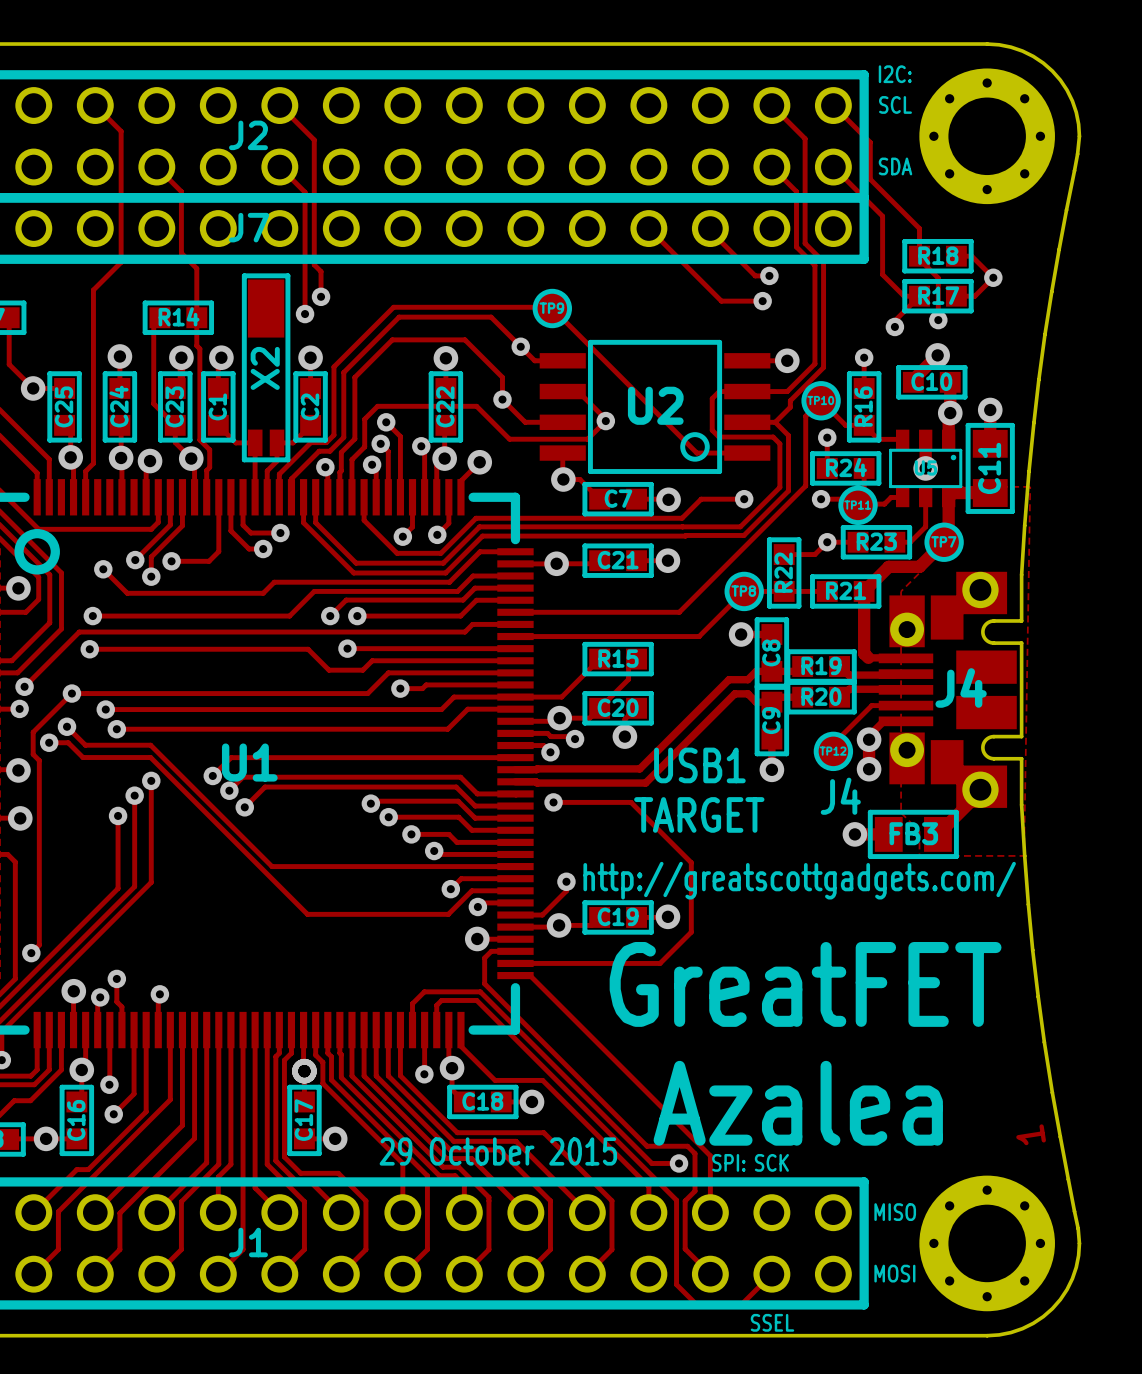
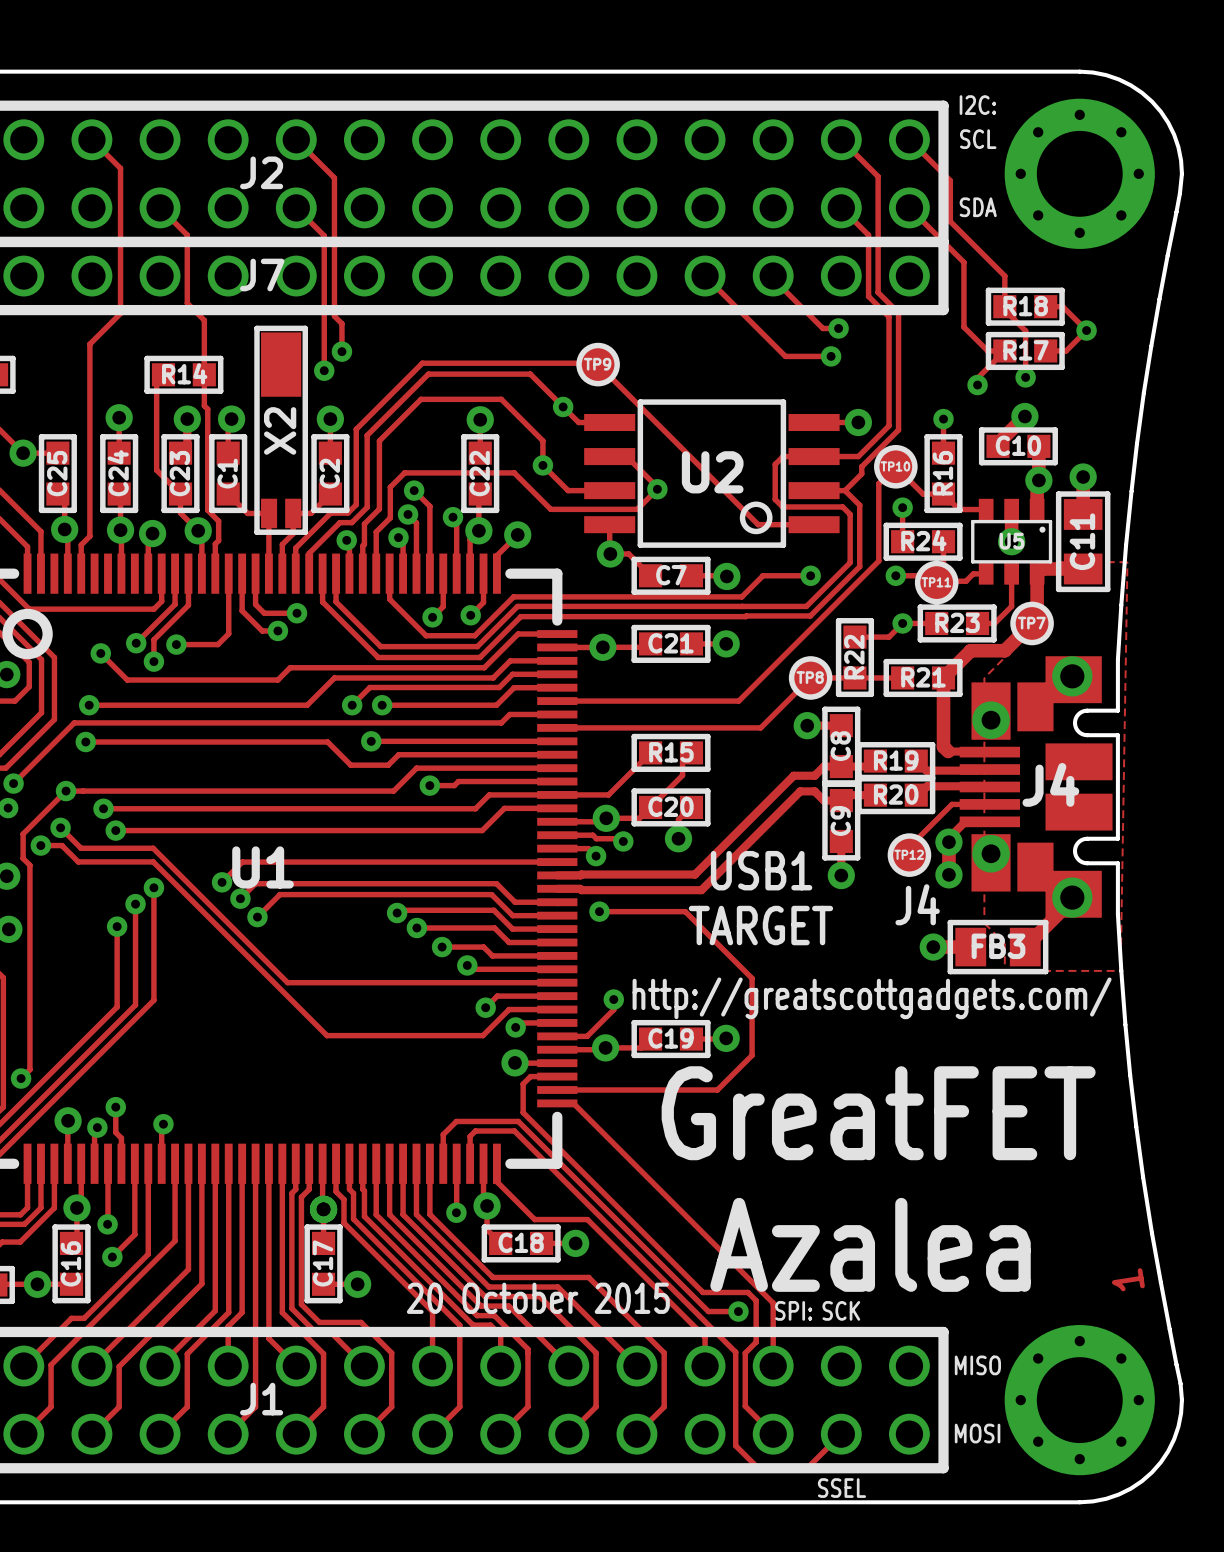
text: 29 October 2015 (498, 1151) -> 20 October 2015 (538, 1298)

